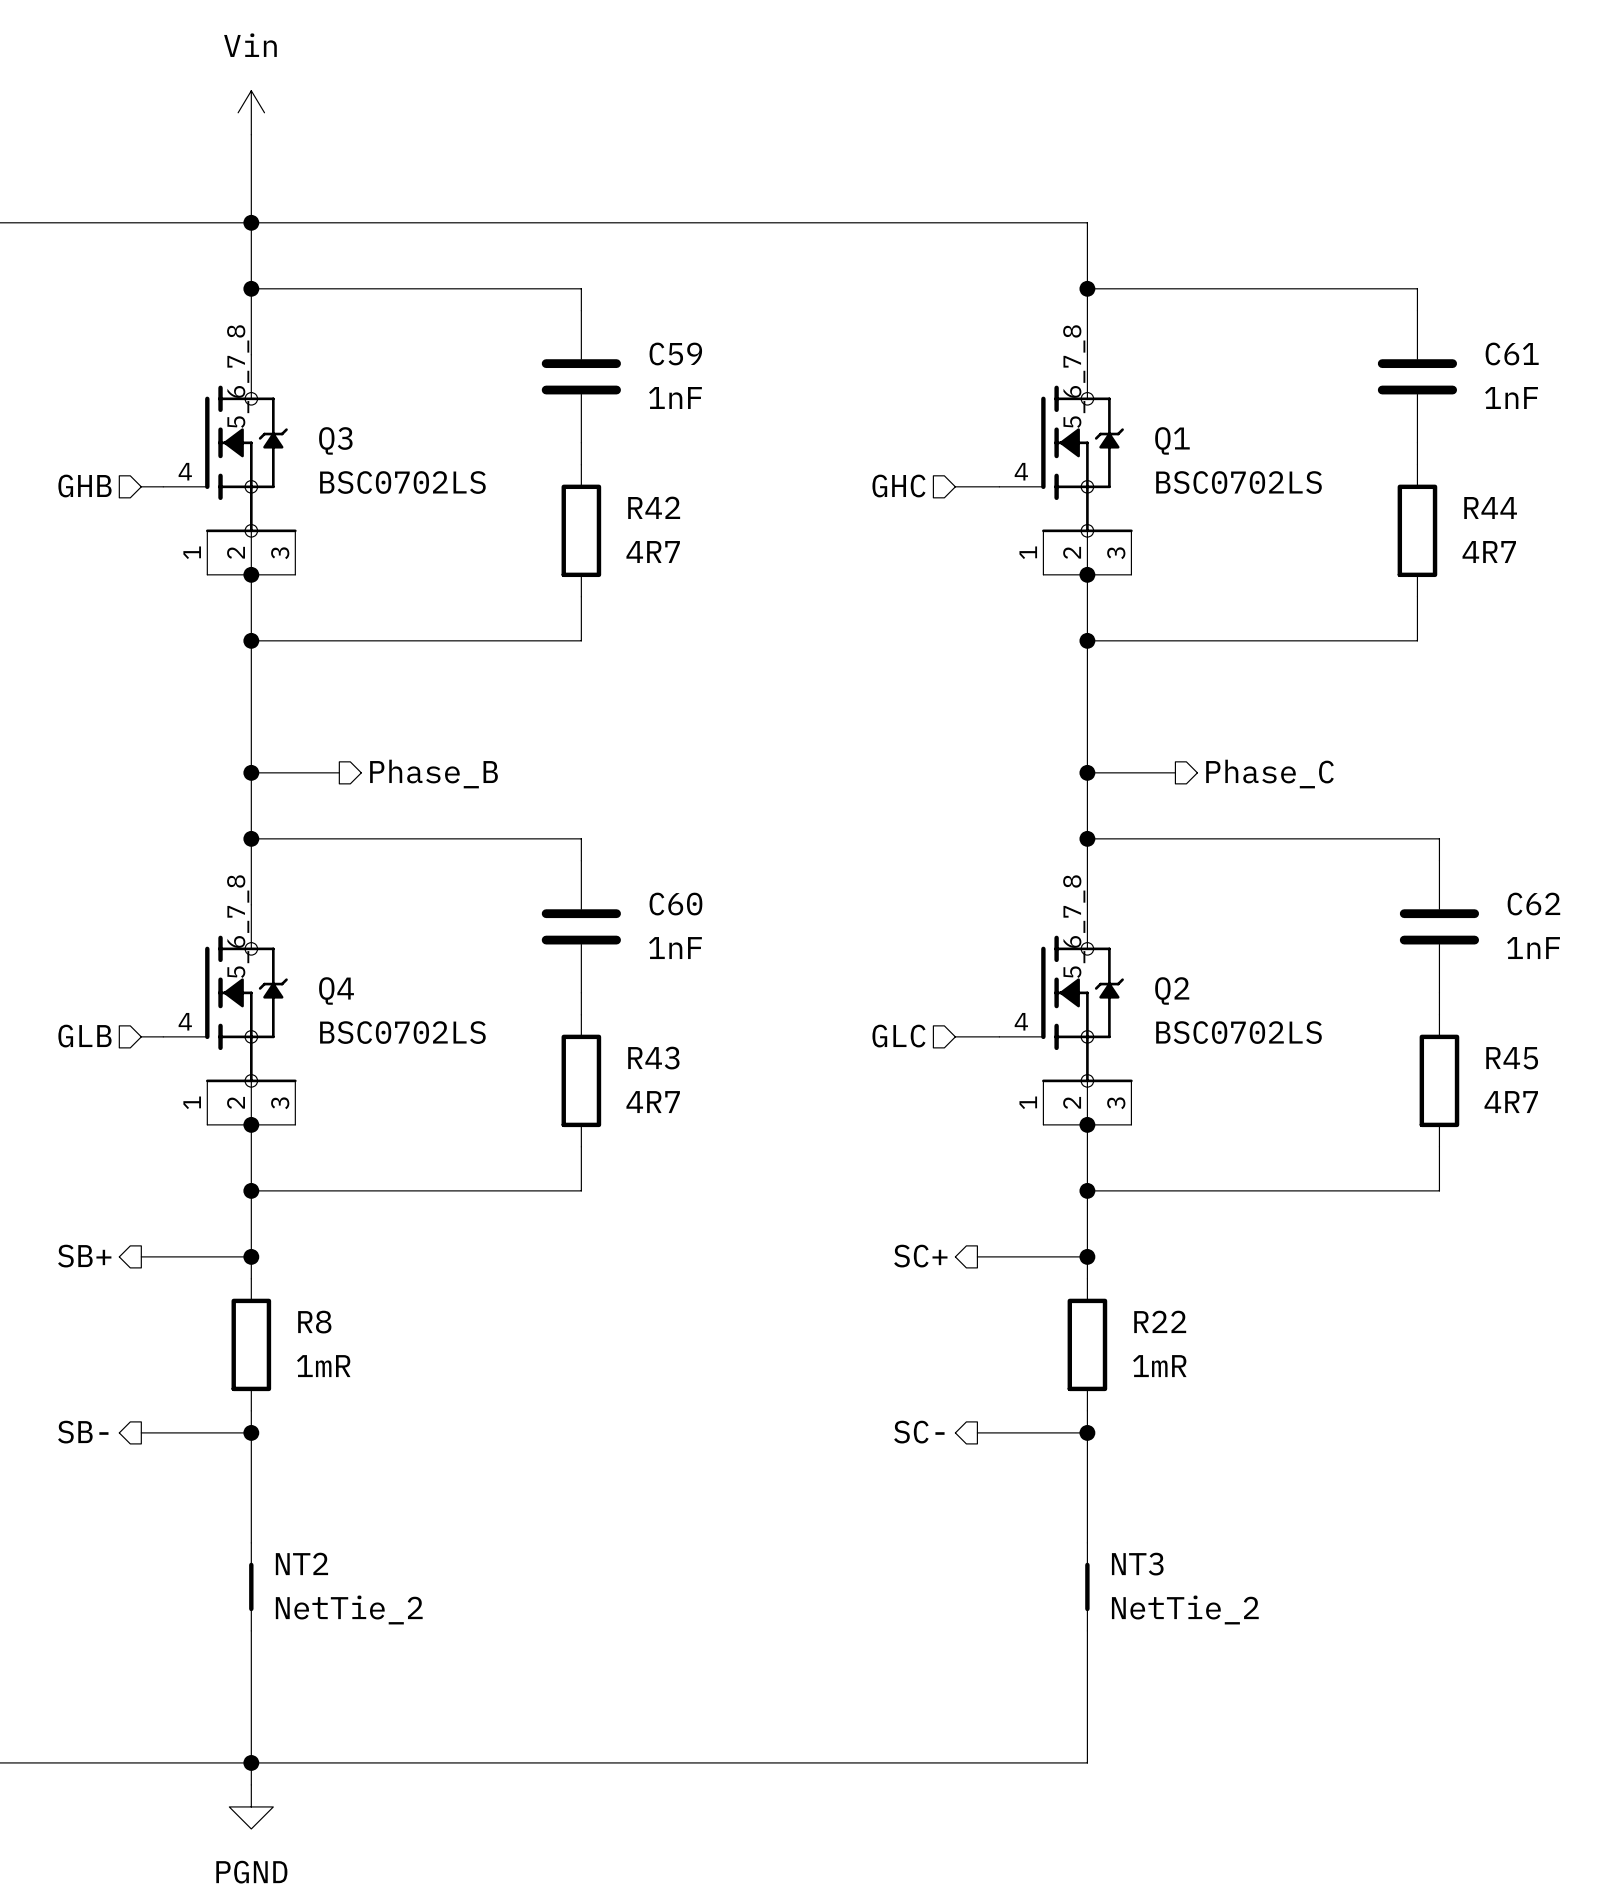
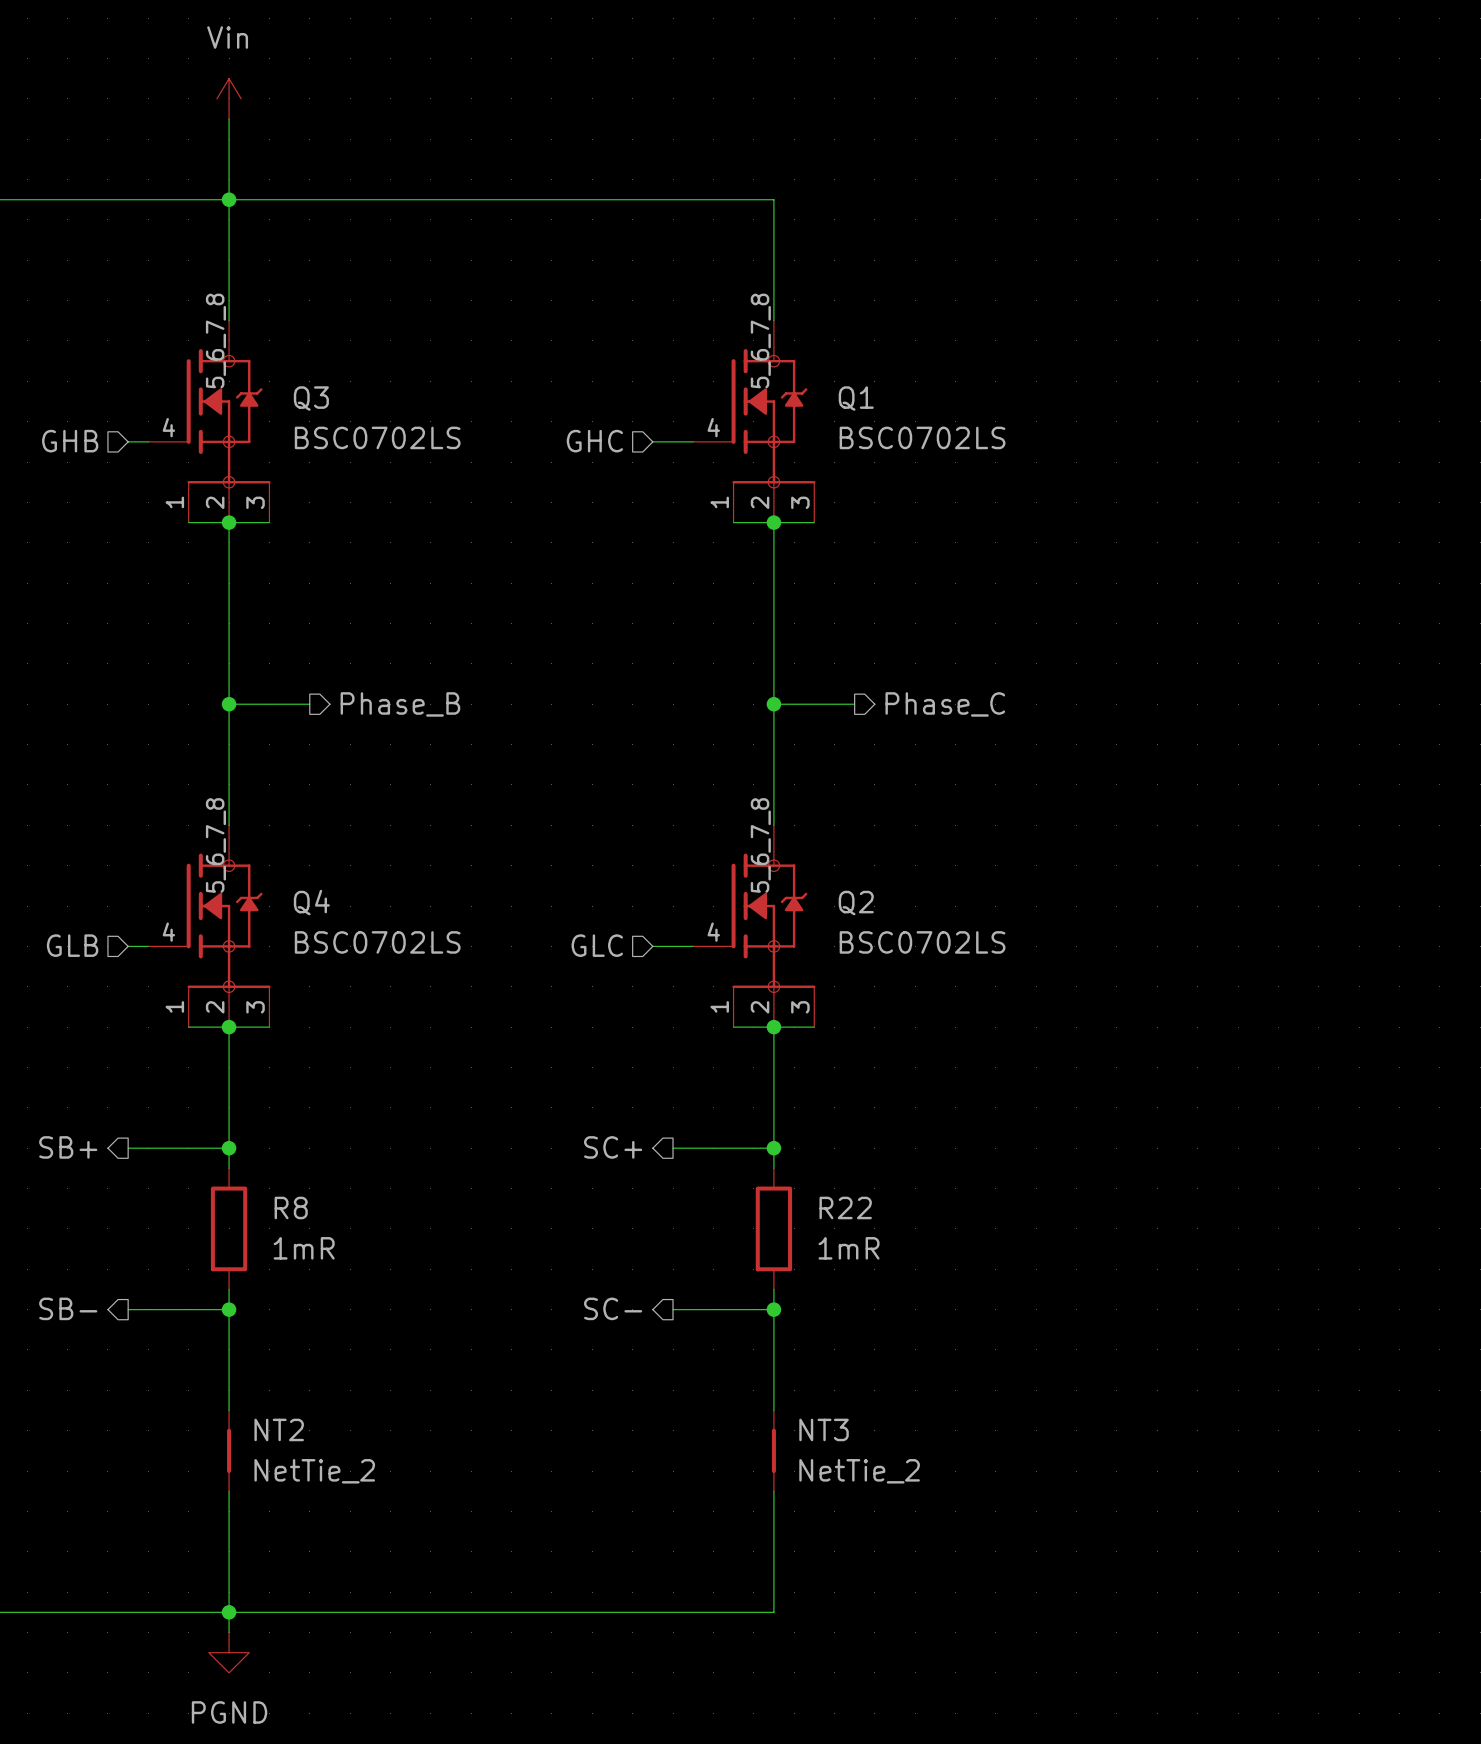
wire: (845, 222) (1087, 222) (1087, 354) -> (773, 199) (773, 320)
wire: (251, 288) (581, 288) (581, 310) -> none
junction: (251, 288) -> none
wire: (1087, 288) (1417, 288) (1417, 310) -> none
junction: (1087, 288) -> none
C59: 1nF (581, 376) -> none
C61: 1nF (1417, 376) -> none
wire: (581, 442) (581, 464) -> none
wire: (1417, 442) (1417, 464) -> none
Q1 position: (1066, 464) -> (754, 421)
hierarchical label position: GHC (898, 486) -> GHC (594, 441)
wire: (955, 486) (999, 486) -> (652, 441) (693, 441)
R42: 4R7 (581, 530) -> none
R44: 4R7 (1417, 530) -> none
junction: none -> (773, 522)
wire: (1043, 574) (1131, 574) -> (733, 522) (814, 522)
wire: (1087, 574) (1087, 904) -> (773, 522) (773, 825)
junction: (1087, 574) -> none
wire: (581, 596) (581, 640) (251, 640) -> none
wire: (1417, 596) (1417, 640) (1087, 640) -> none
junction: (251, 640) -> none
junction: (1087, 640) -> none
junction: none -> (773, 704)
wire: (1087, 772) (1175, 772) -> (773, 704) (854, 704)
junction: (1087, 772) -> none
hierarchical label position: Phase_C (1269, 774) -> Phase_C (945, 704)
wire: (251, 838) (581, 838) (581, 860) -> none
junction: (251, 838) -> none
wire: (1087, 838) (1439, 838) (1439, 860) -> none
junction: (1087, 838) -> none
C60: 1nF (581, 926) -> none
C62: 1nF (1439, 926) -> none
wire: (581, 992) (581, 1014) -> none
wire: (1439, 992) (1439, 1014) -> none
Q2 position: (1066, 1014) -> (754, 926)
hierarchical label position: GLC (898, 1036) -> GLC (597, 945)
wire: (955, 1036) (999, 1036) -> (652, 946) (693, 946)
R43: 4R7 (581, 1080) -> none
R45: 4R7 (1439, 1080) -> none
junction: none -> (773, 1027)
wire: (1043, 1124) (1131, 1124) -> (733, 1027) (814, 1027)
wire: (1087, 1124) (1087, 1278) -> (773, 1027) (773, 1168)
junction: (1087, 1124) -> none
wire: (581, 1146) (581, 1190) (251, 1190) -> none
wire: (1439, 1146) (1439, 1190) (1087, 1190) -> none
junction: (251, 1190) -> none
junction: (1087, 1190) -> none
junction: none -> (773, 1148)
hierarchical label position: SC+ (920, 1256) -> SC+ (613, 1147)
wire: (977, 1256) (1087, 1256) -> (673, 1148) (773, 1148)
junction: (1087, 1256) -> none
R22 position: (1087, 1344) -> (773, 1228)
wire: (1087, 1410) (1087, 1542) -> (773, 1289) (773, 1410)
junction: none -> (773, 1309)
hierarchical label position: SC- (919, 1432) -> SC- (613, 1308)
wire: (977, 1432) (1087, 1432) -> (673, 1309) (773, 1309)
junction: (1087, 1432) -> none
NT3 position: (1087, 1586) -> (773, 1450)
wire: (1087, 1630) (1087, 1762) (845, 1762) -> (773, 1491) (773, 1612)

